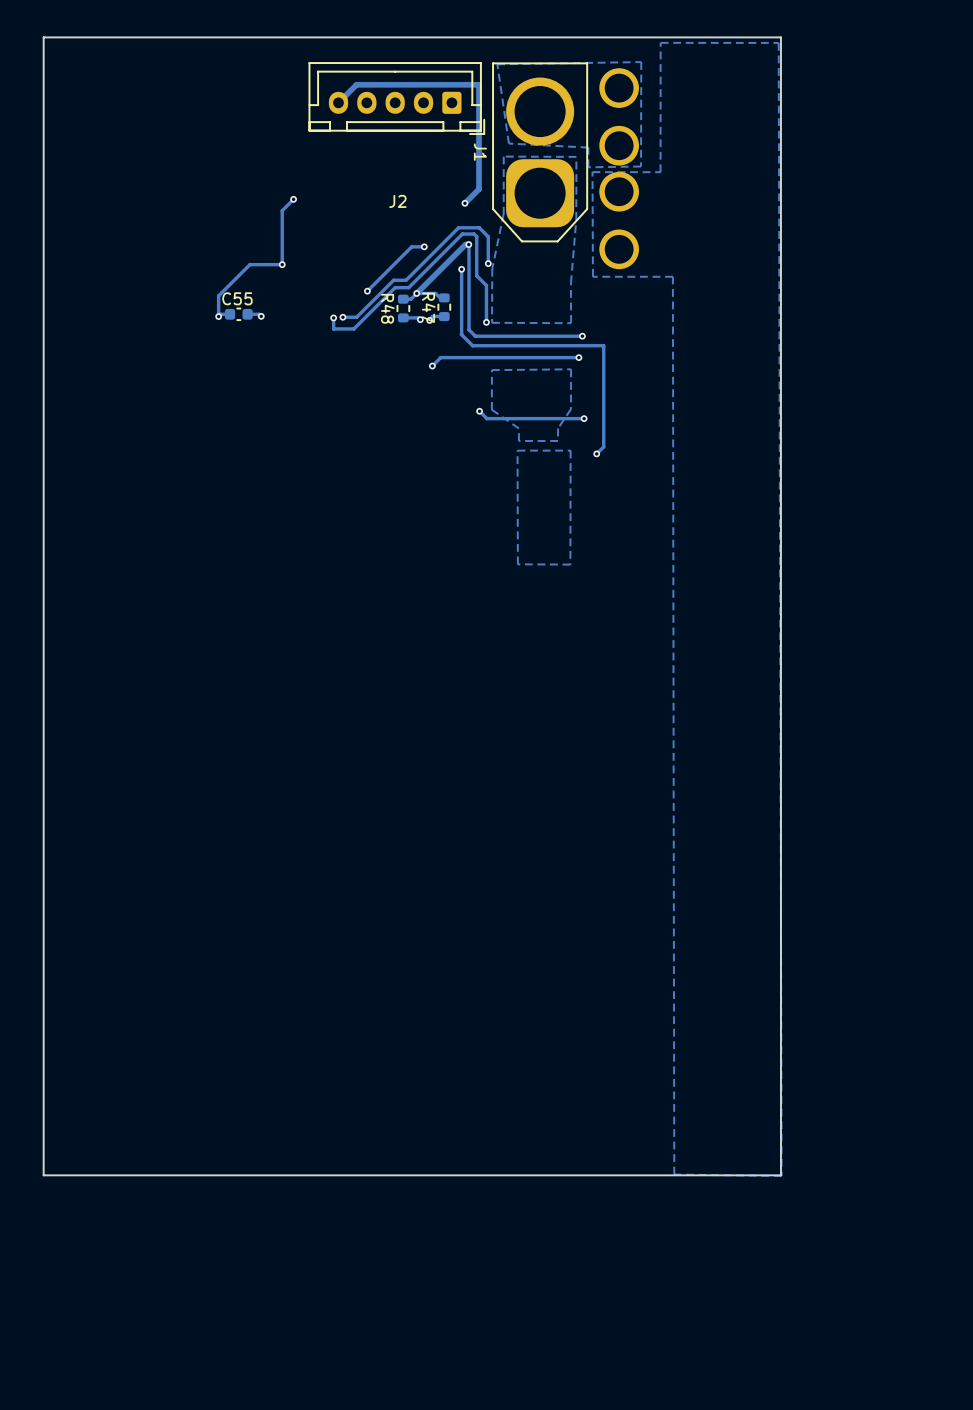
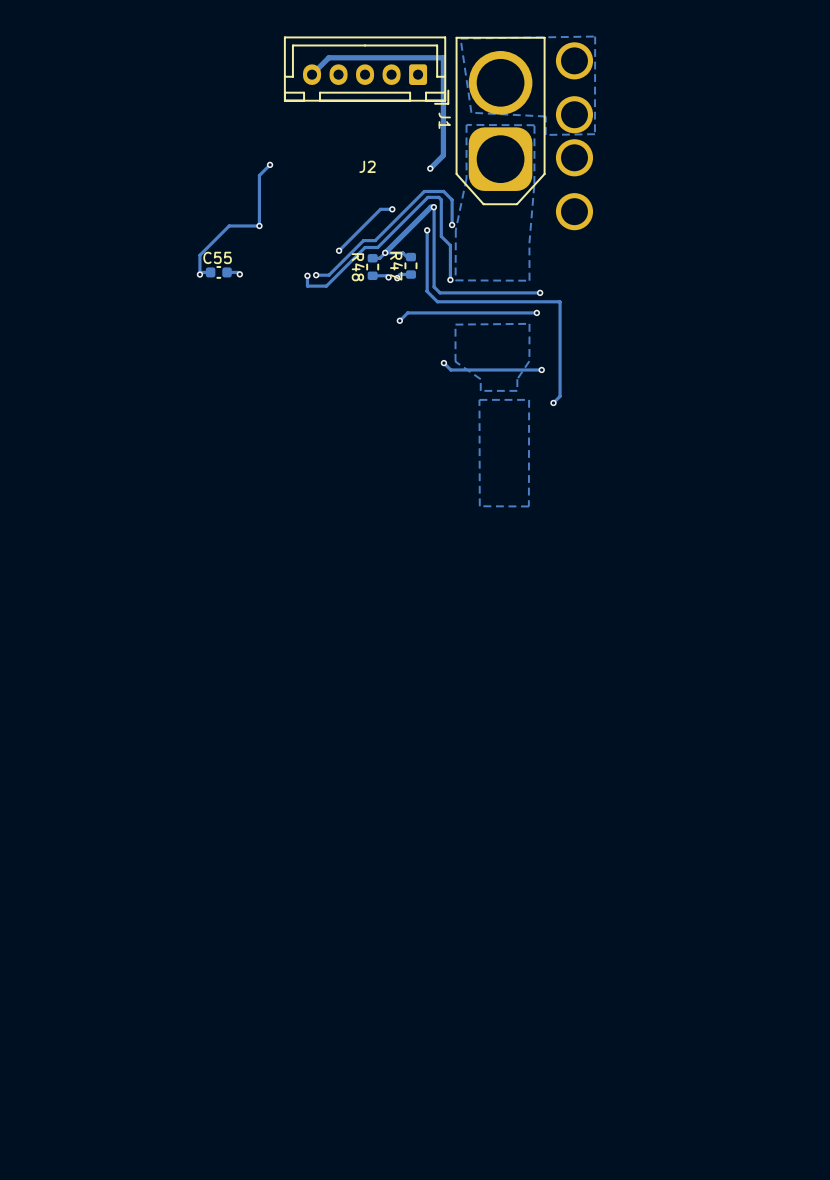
board edge: (780, 37) (43, 37) (43, 1175) (780, 1175) (780, 37) -> none
zone outline: (660, 42) (660, 172) (592, 172) (592, 276) (672, 276) (674, 1174) (781, 1176) (778, 42) (660, 42) -> none

